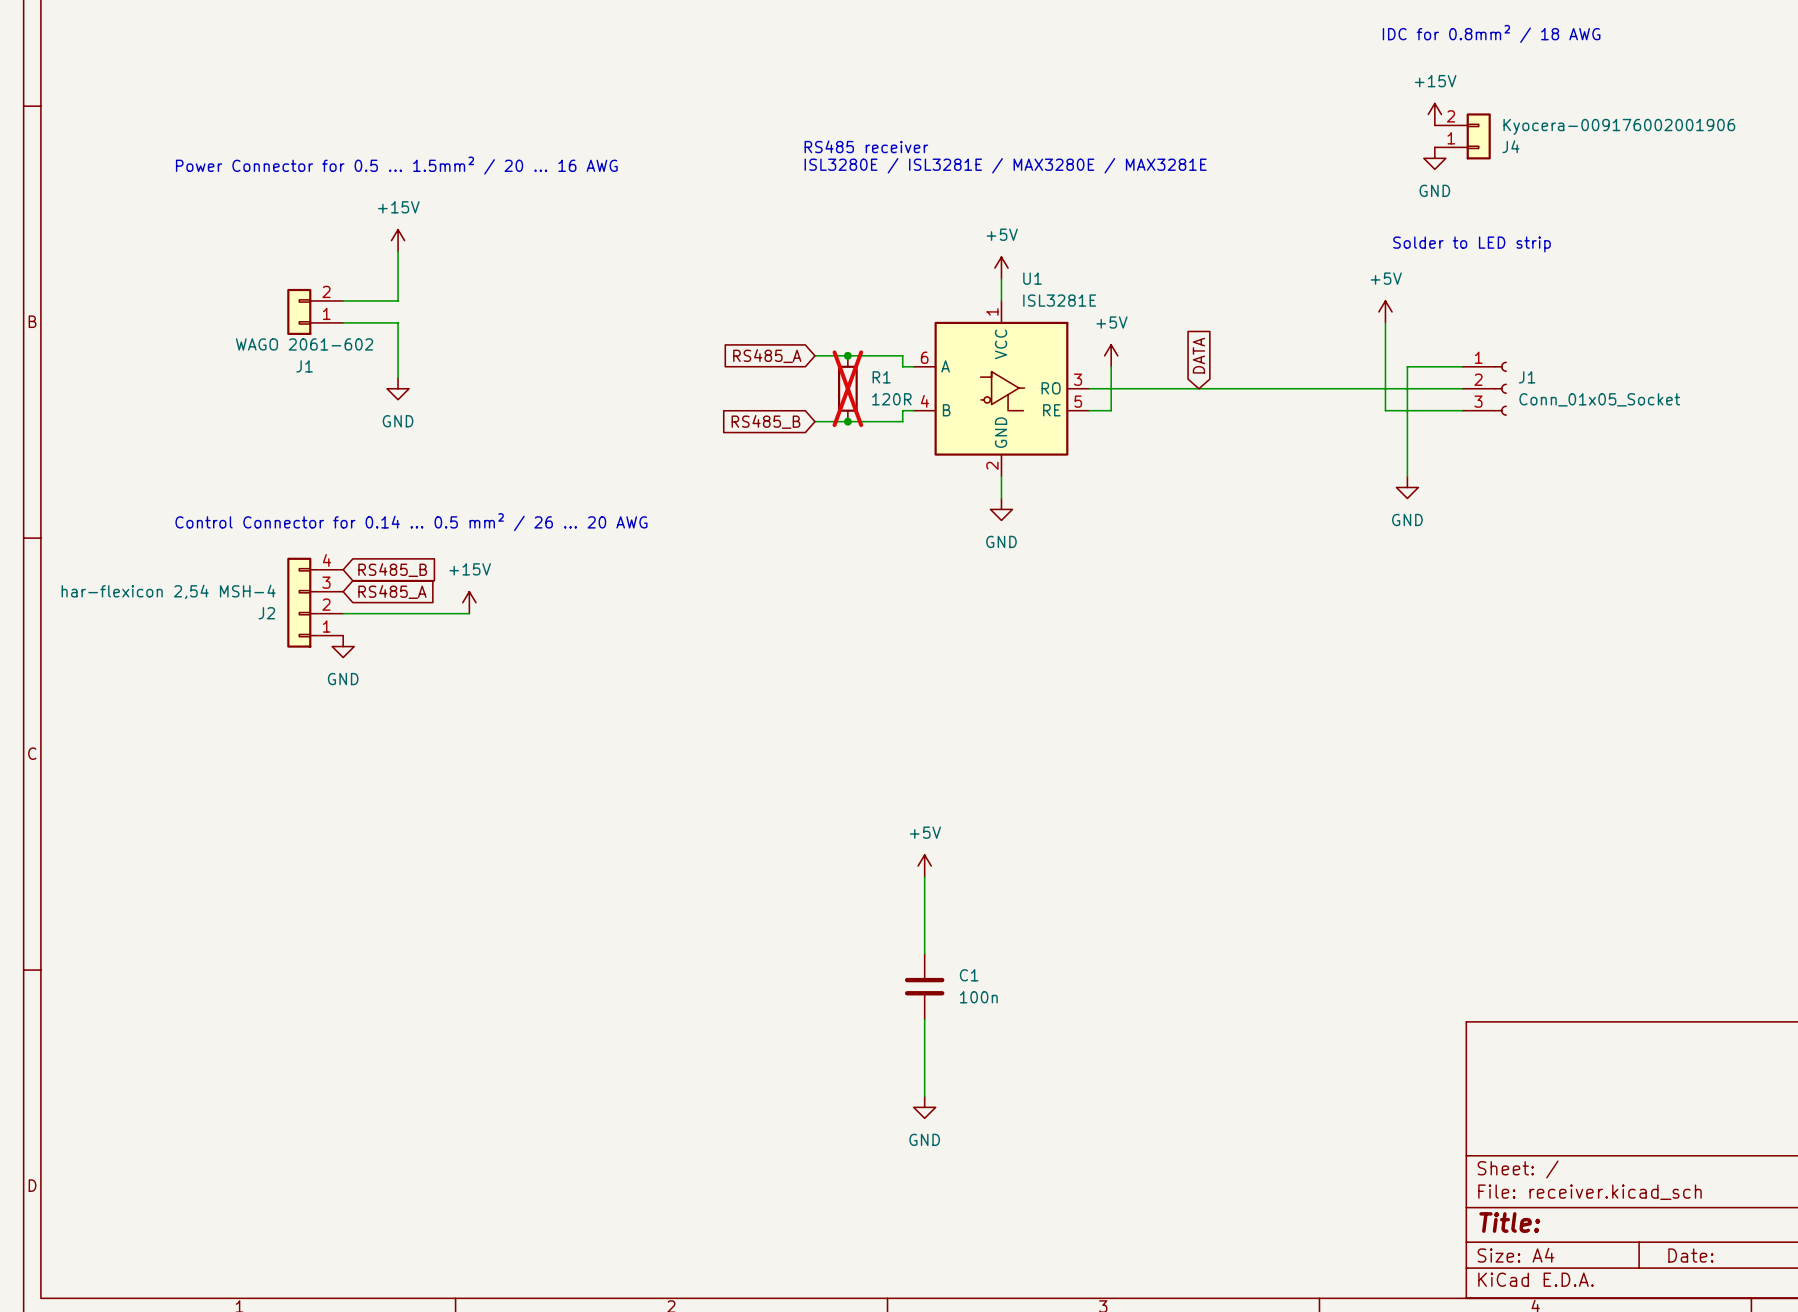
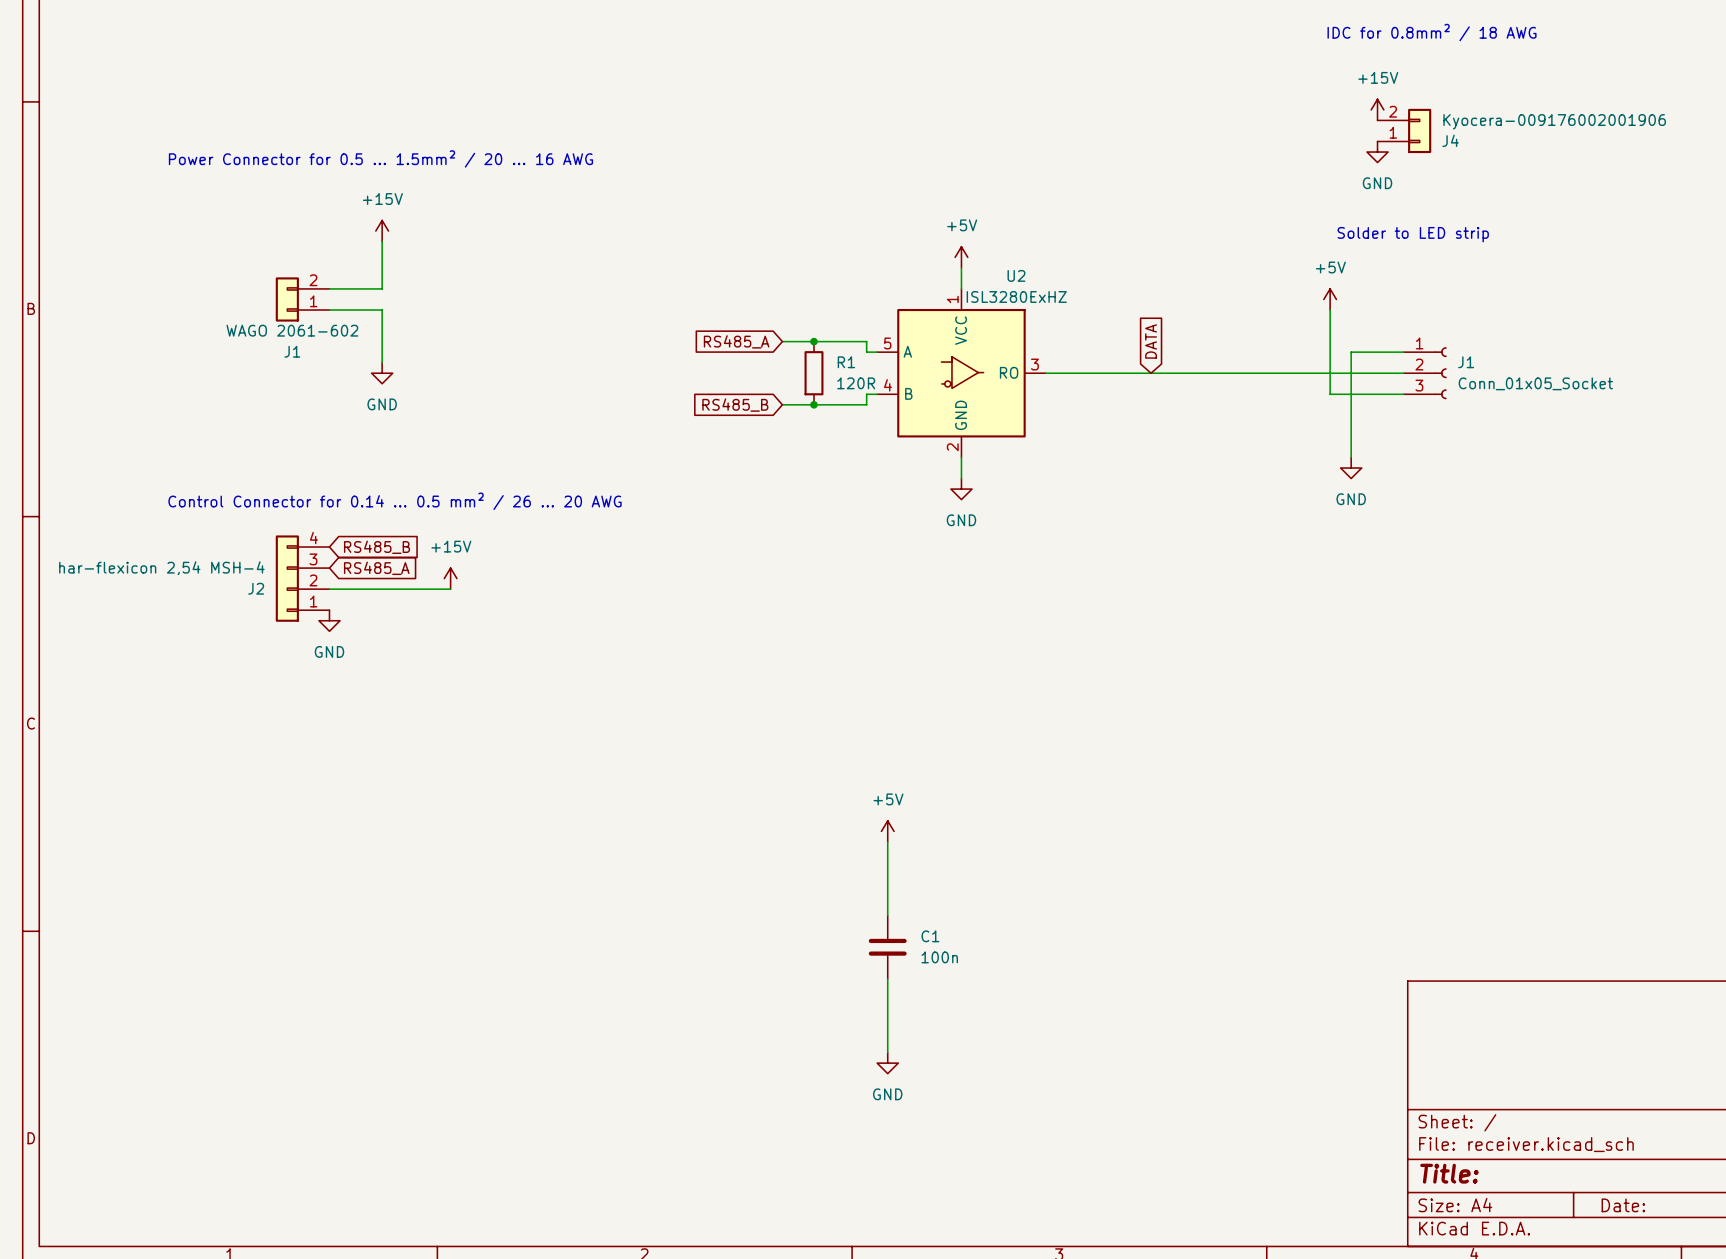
text: RS485 receiver (866, 146) -> none
text: ISL3280E / ISL3281E / MAX3280E / MAX3281E (1005, 165) -> none
power symbol: +5V (1111, 355) -> none
wire: (1111, 366) (1111, 410) (1089, 410) -> none
R1 do-not-place cross: (847, 388) -> none
U1: ISL3281E (1001, 388) -> none
U2: none -> ISL3280ExHZ (961, 373)

